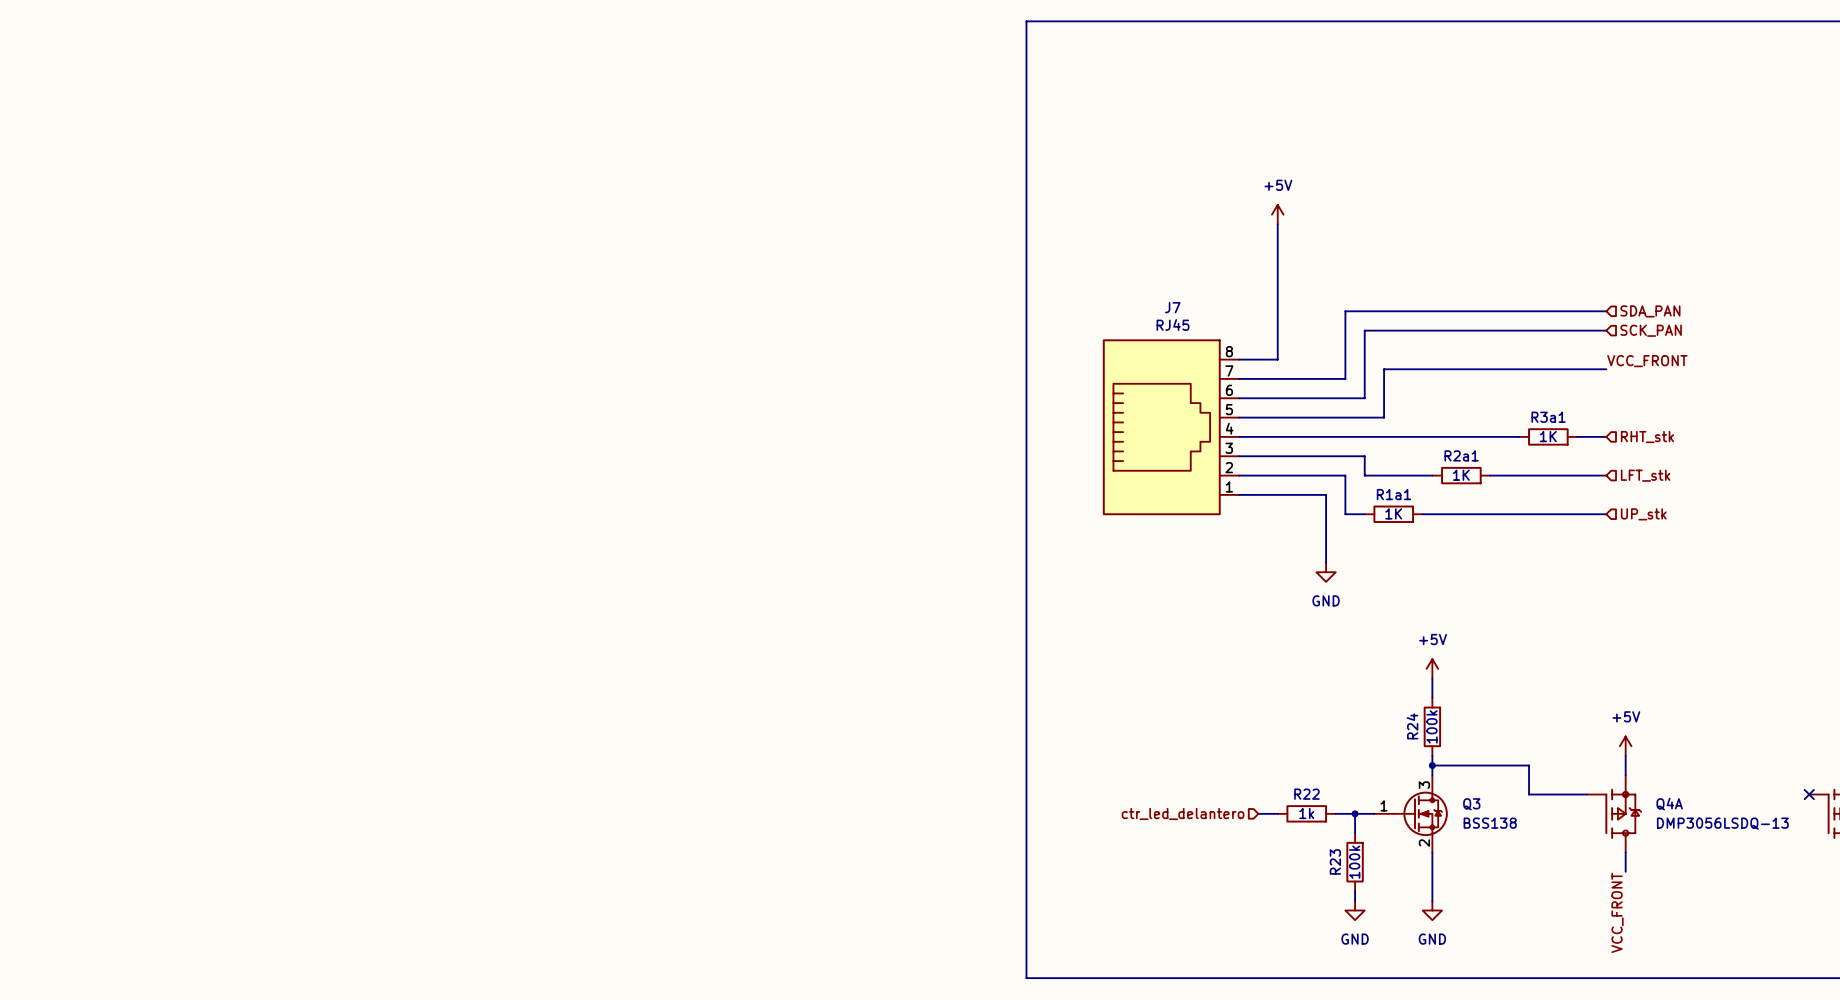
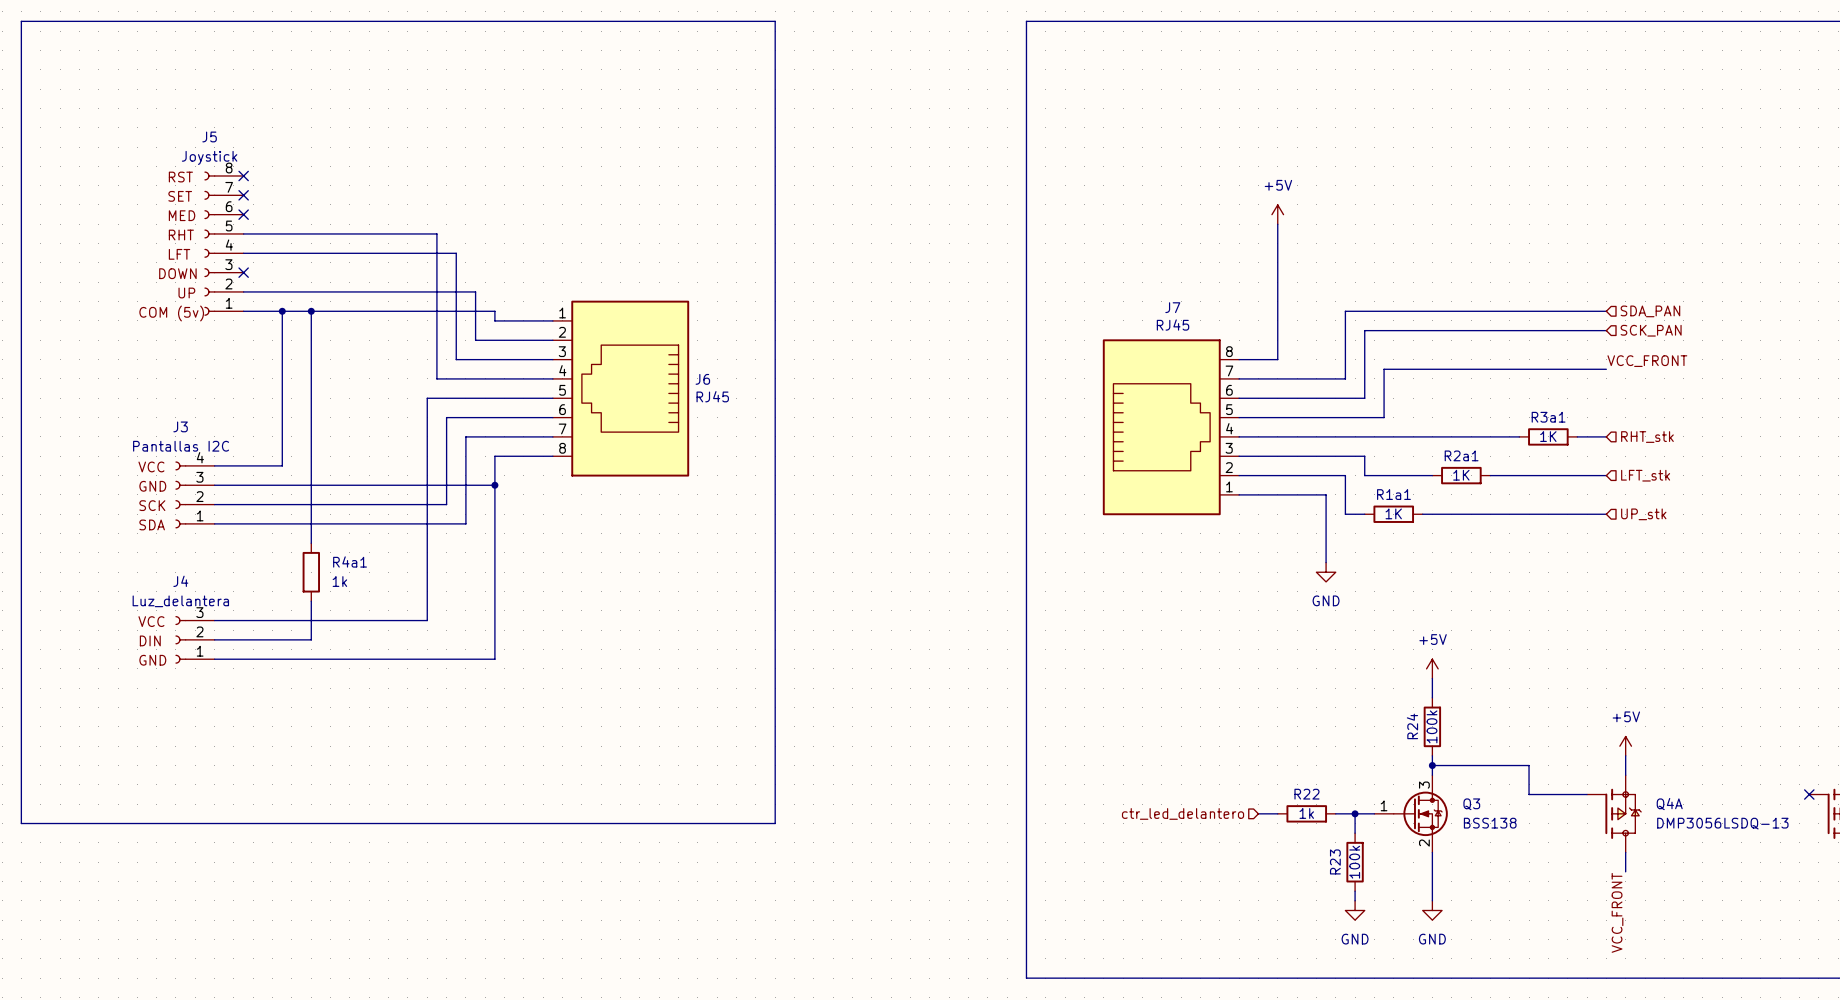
line: none -> (21, 21) (775, 21) (775, 823) (21, 823) (21, 21)
no-connect mark: none -> (243, 175)
label: none -> RST (180, 177)
no-connect mark: none -> (243, 195)
label: none -> SET (180, 196)
no-connect mark: none -> (243, 214)
label: none -> MED (182, 215)
wire: none -> (243, 233) (436, 233) (436, 378) (552, 378)
label: none -> RHT (181, 235)
J5: none -> Joystick (224, 243)
wire: none -> (243, 253) (456, 253) (456, 359) (552, 359)
label: none -> LFT (179, 254)
no-connect mark: none -> (243, 272)
label: none -> DOWN (177, 273)
wire: none -> (243, 291) (475, 291) (475, 340) (552, 340)
label: none -> UP (186, 293)
wire: none -> (243, 311) (494, 311) (494, 320) (552, 320)
wire: none -> (282, 311) (282, 465) (214, 465)
junction: none -> (282, 311)
wire: none -> (311, 311) (311, 543)
junction: none -> (311, 311)
label: none -> COM (5v) (171, 313)
J6: none -> RJ45 (621, 388)
wire: none -> (552, 398) (427, 398) (427, 620) (214, 620)
wire: none -> (552, 417) (446, 417) (446, 504) (214, 504)
wire: none -> (552, 436) (465, 436) (465, 523) (214, 523)
wire: none -> (552, 456) (494, 456) (494, 659) (214, 659)
label: none -> VCC (151, 466)
wire: none -> (214, 485) (494, 485)
junction: none -> (494, 485)
label: none -> GND (152, 486)
J3: none -> Pantallas I2C (195, 494)
label: none -> SCK (152, 505)
label: none -> SDA (152, 524)
R4a1: none -> 1k (311, 572)
wire: none -> (311, 601) (311, 639) (214, 639)
label: none -> VCC (151, 621)
J4: none -> Luz_delantera (195, 639)
label: none -> DIN (150, 640)
label: none -> GND (152, 660)

